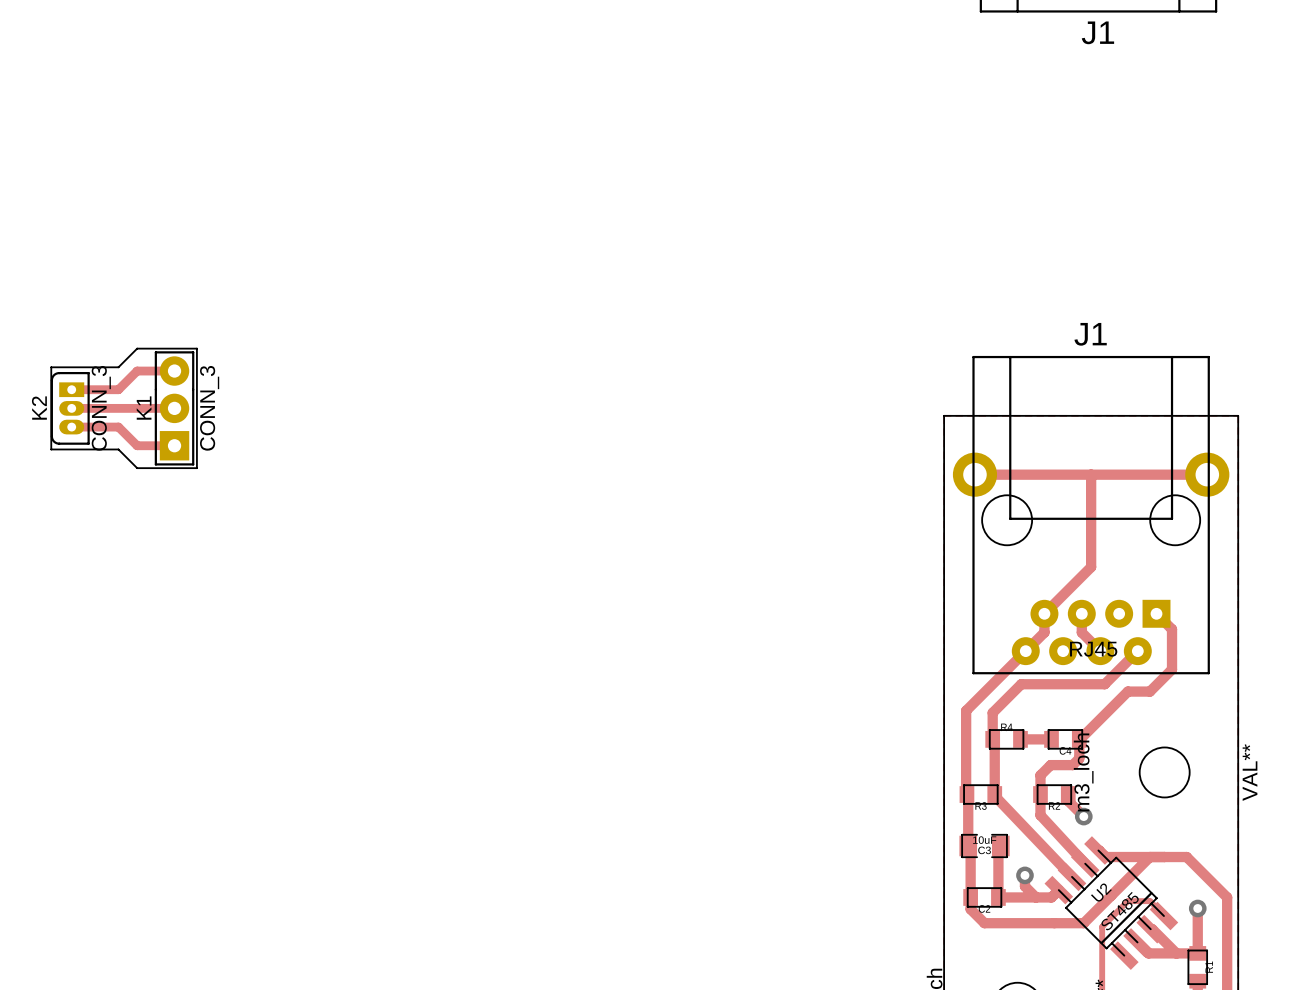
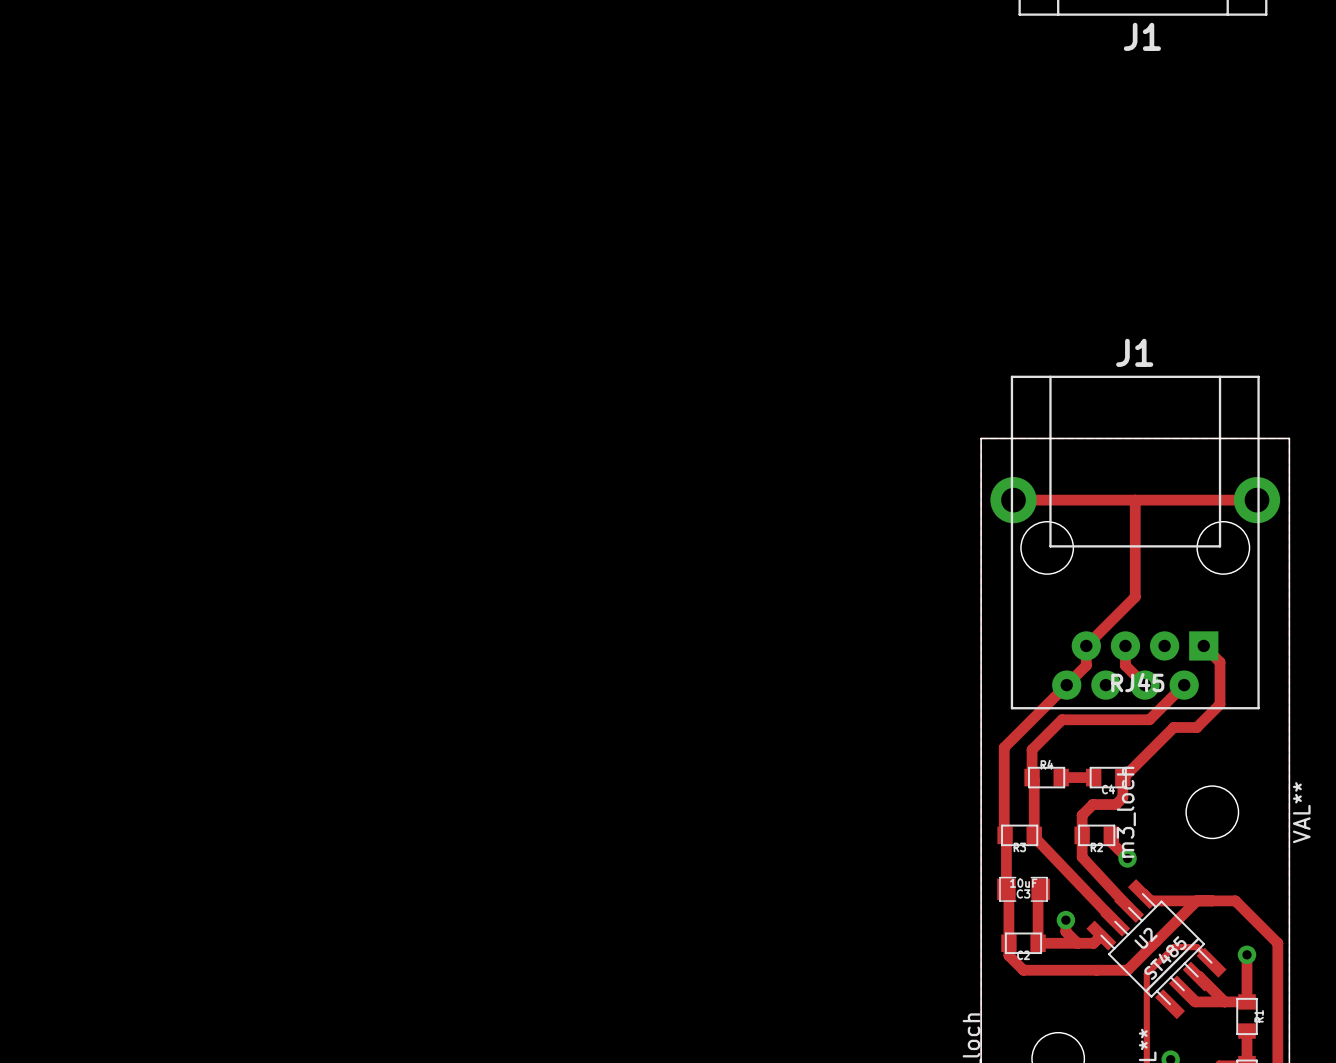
board edge: (137, 348) (118, 367) (51, 367) (51, 449) (118, 449) (137, 468) (196, 468) (196, 348) (137, 348) -> none
track: (174, 371) (137, 371) (118, 389) (71, 389) -> none
K2: CONN_3 (70, 408) -> none
track: (71, 408) (174, 408) -> none
K1: CONN_3 (174, 408) -> none
track: (71, 427) (118, 427) (137, 445) (174, 445) -> none

